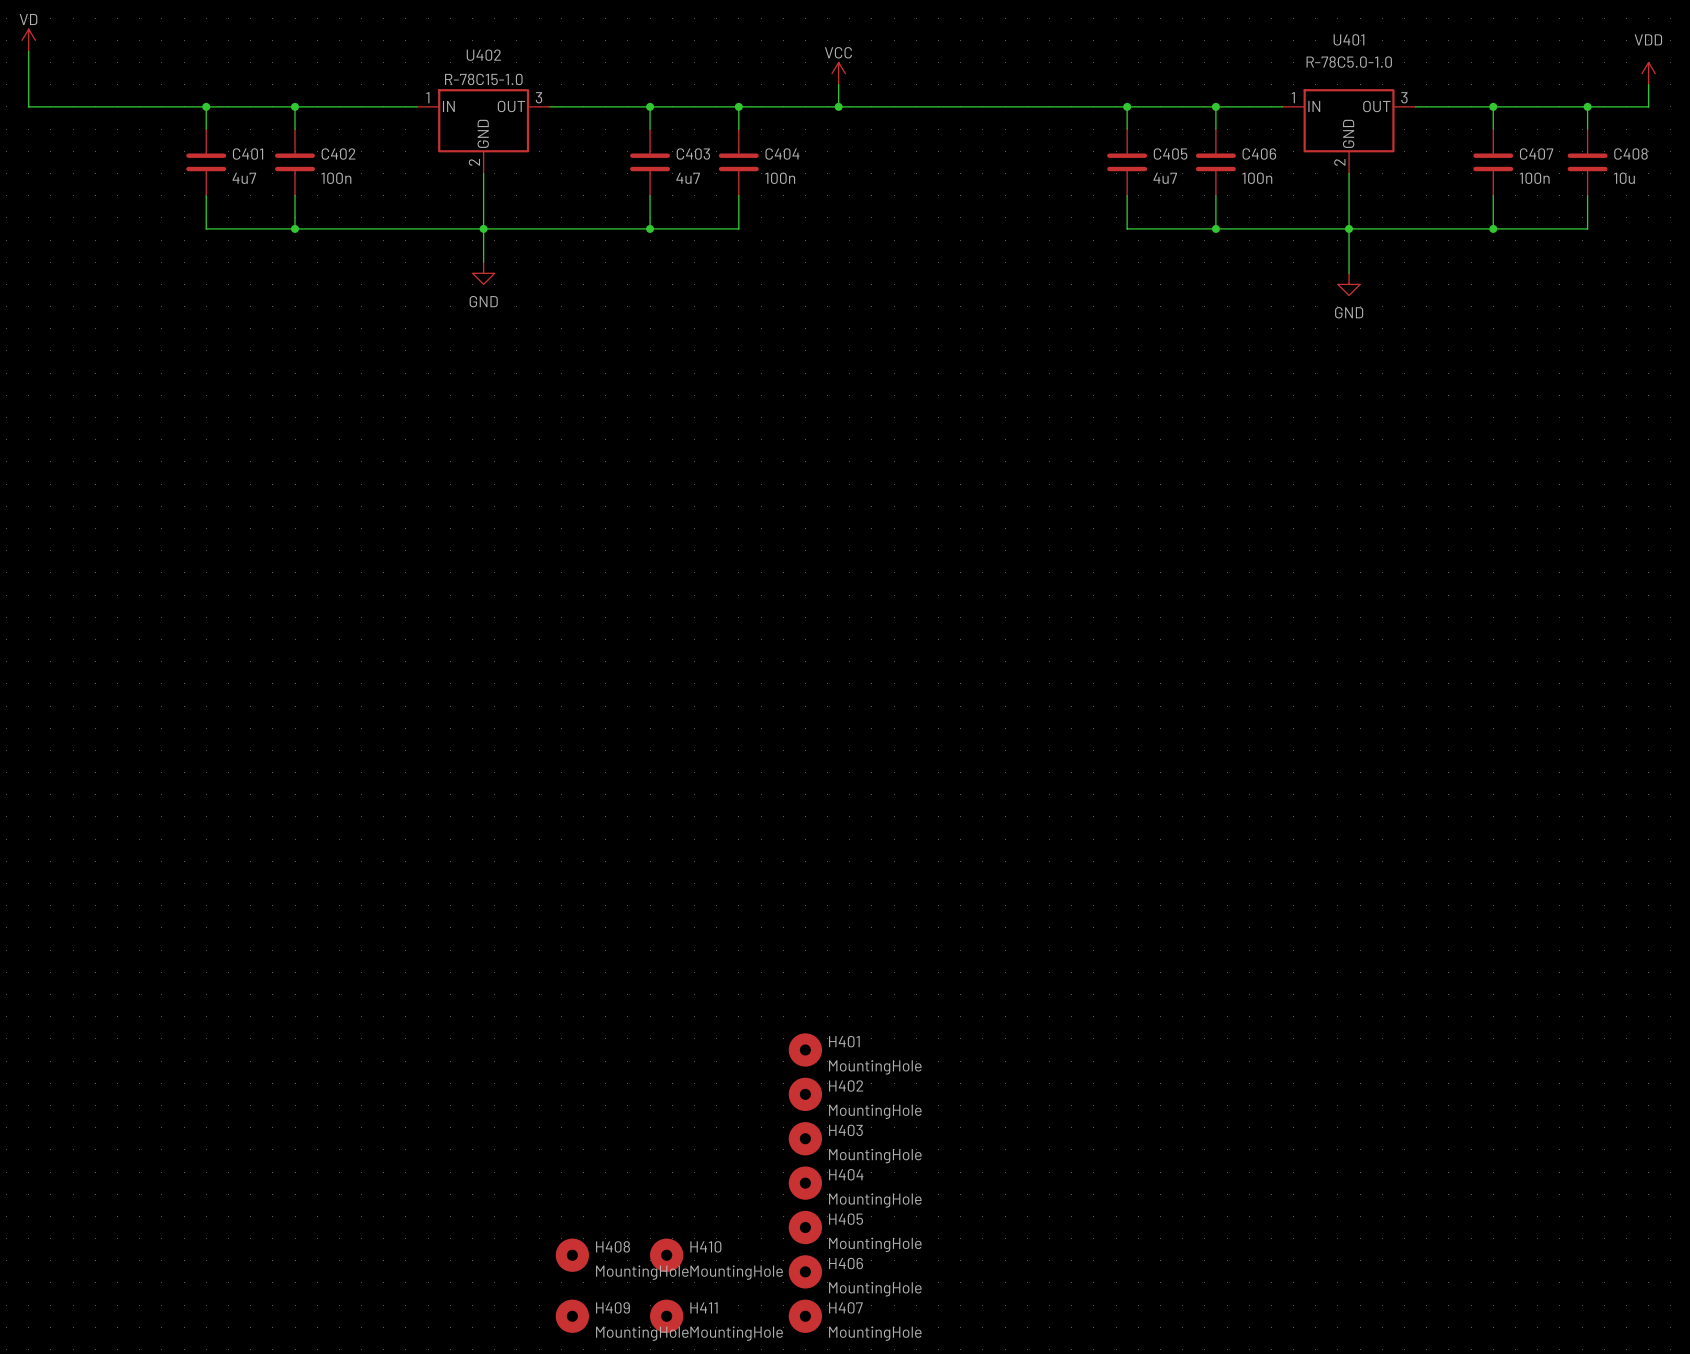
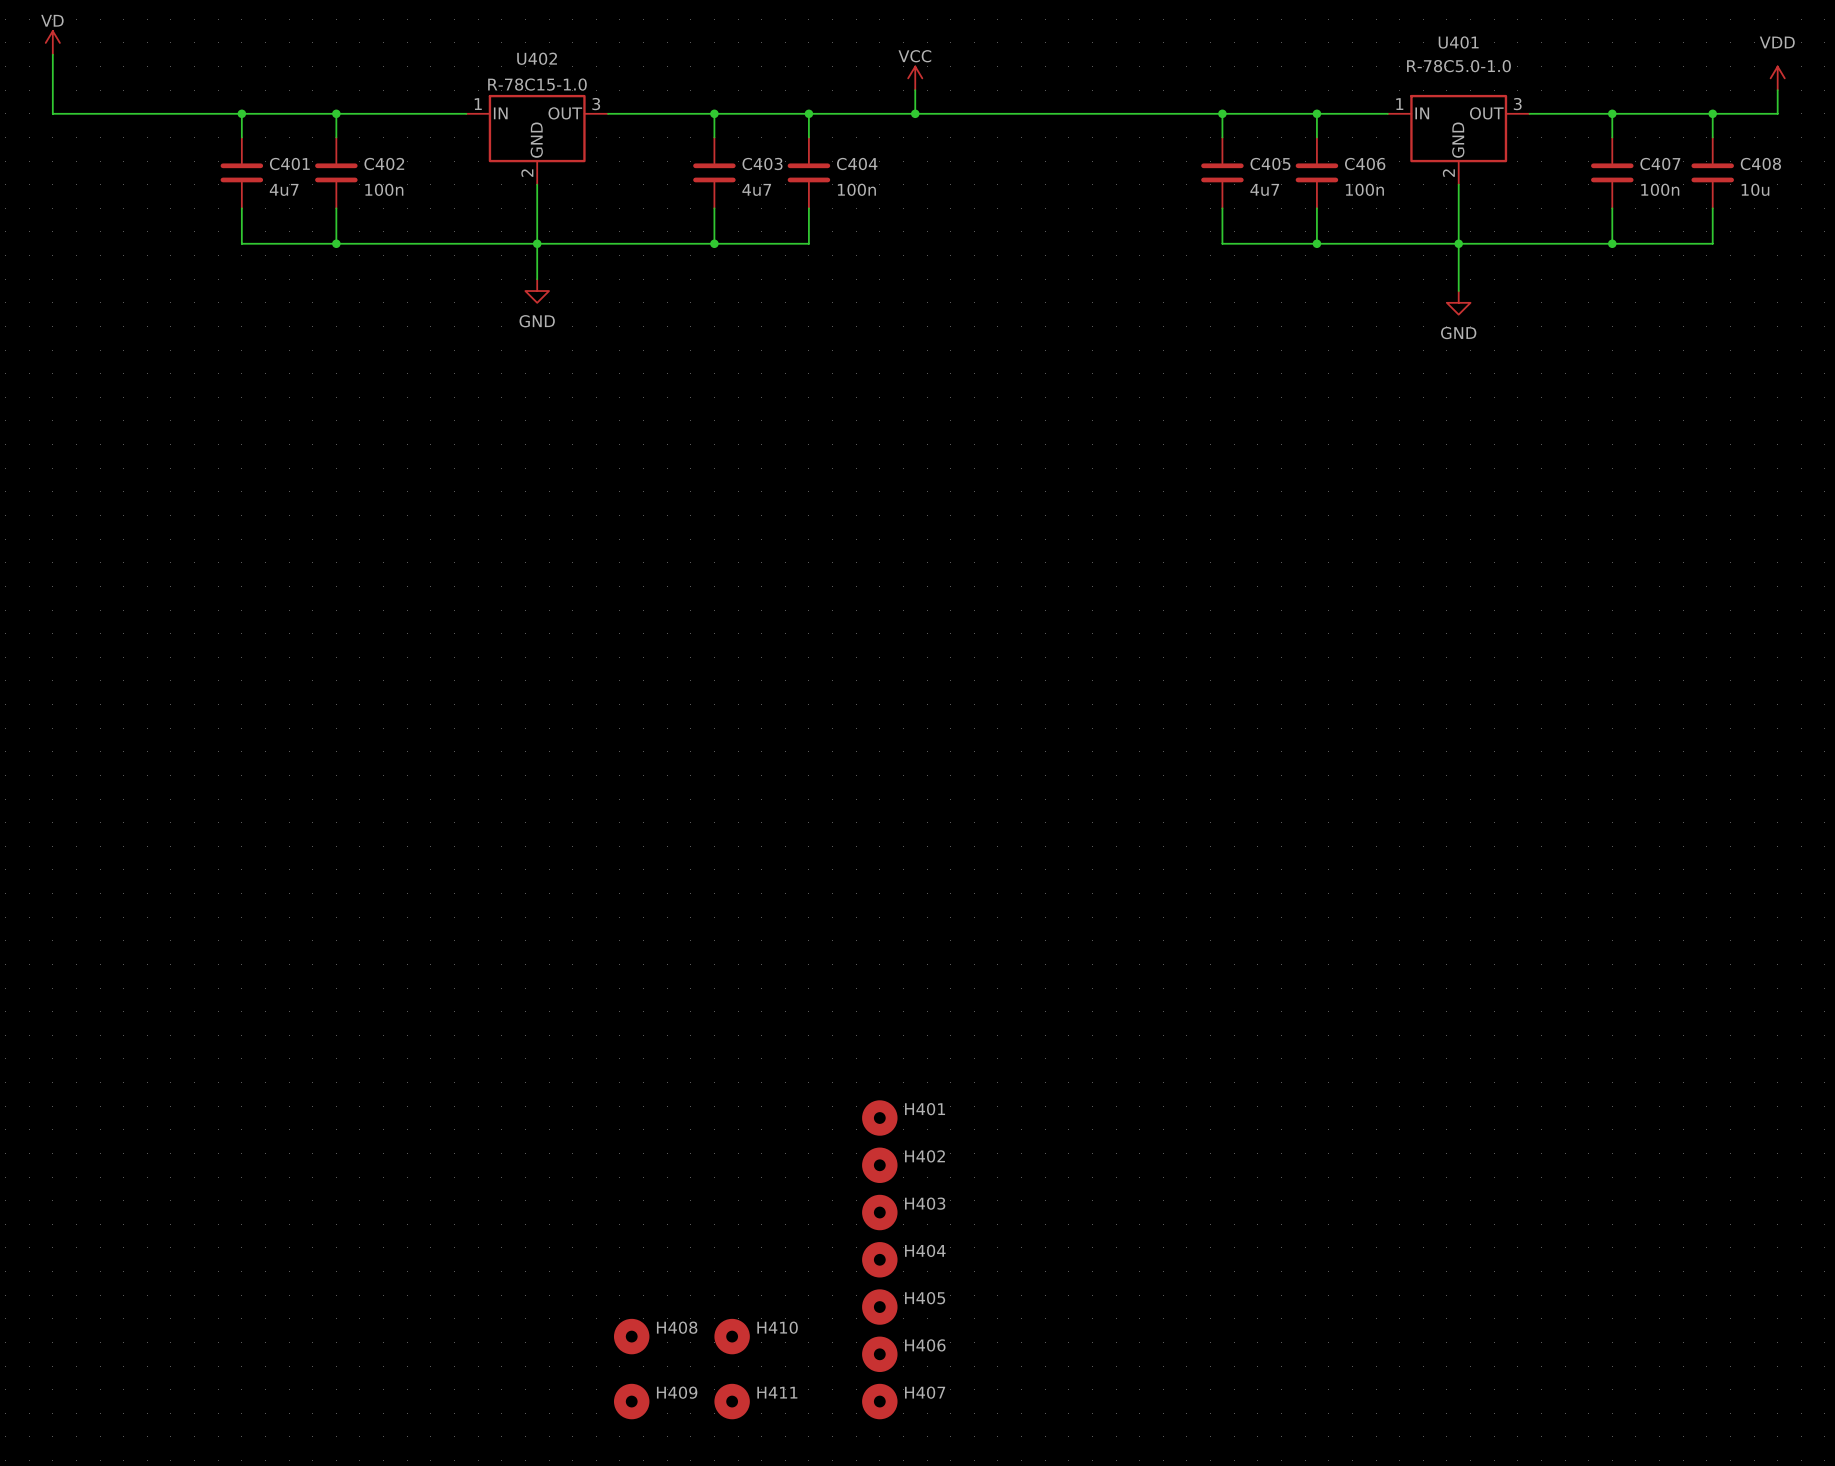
H401 value: MountingHole (875, 1067) -> none
H402 value: MountingHole (875, 1111) -> none
H403 value: MountingHole (875, 1156) -> none
H404 value: MountingHole (875, 1200) -> none
H405 value: MountingHole (875, 1244) -> none
H408 value: MountingHole (642, 1272) -> none
H410 value: MountingHole (736, 1272) -> none
H406 value: MountingHole (875, 1289) -> none
H409 value: MountingHole (642, 1333) -> none
H411 value: MountingHole (736, 1333) -> none
H407 value: MountingHole (875, 1333) -> none

